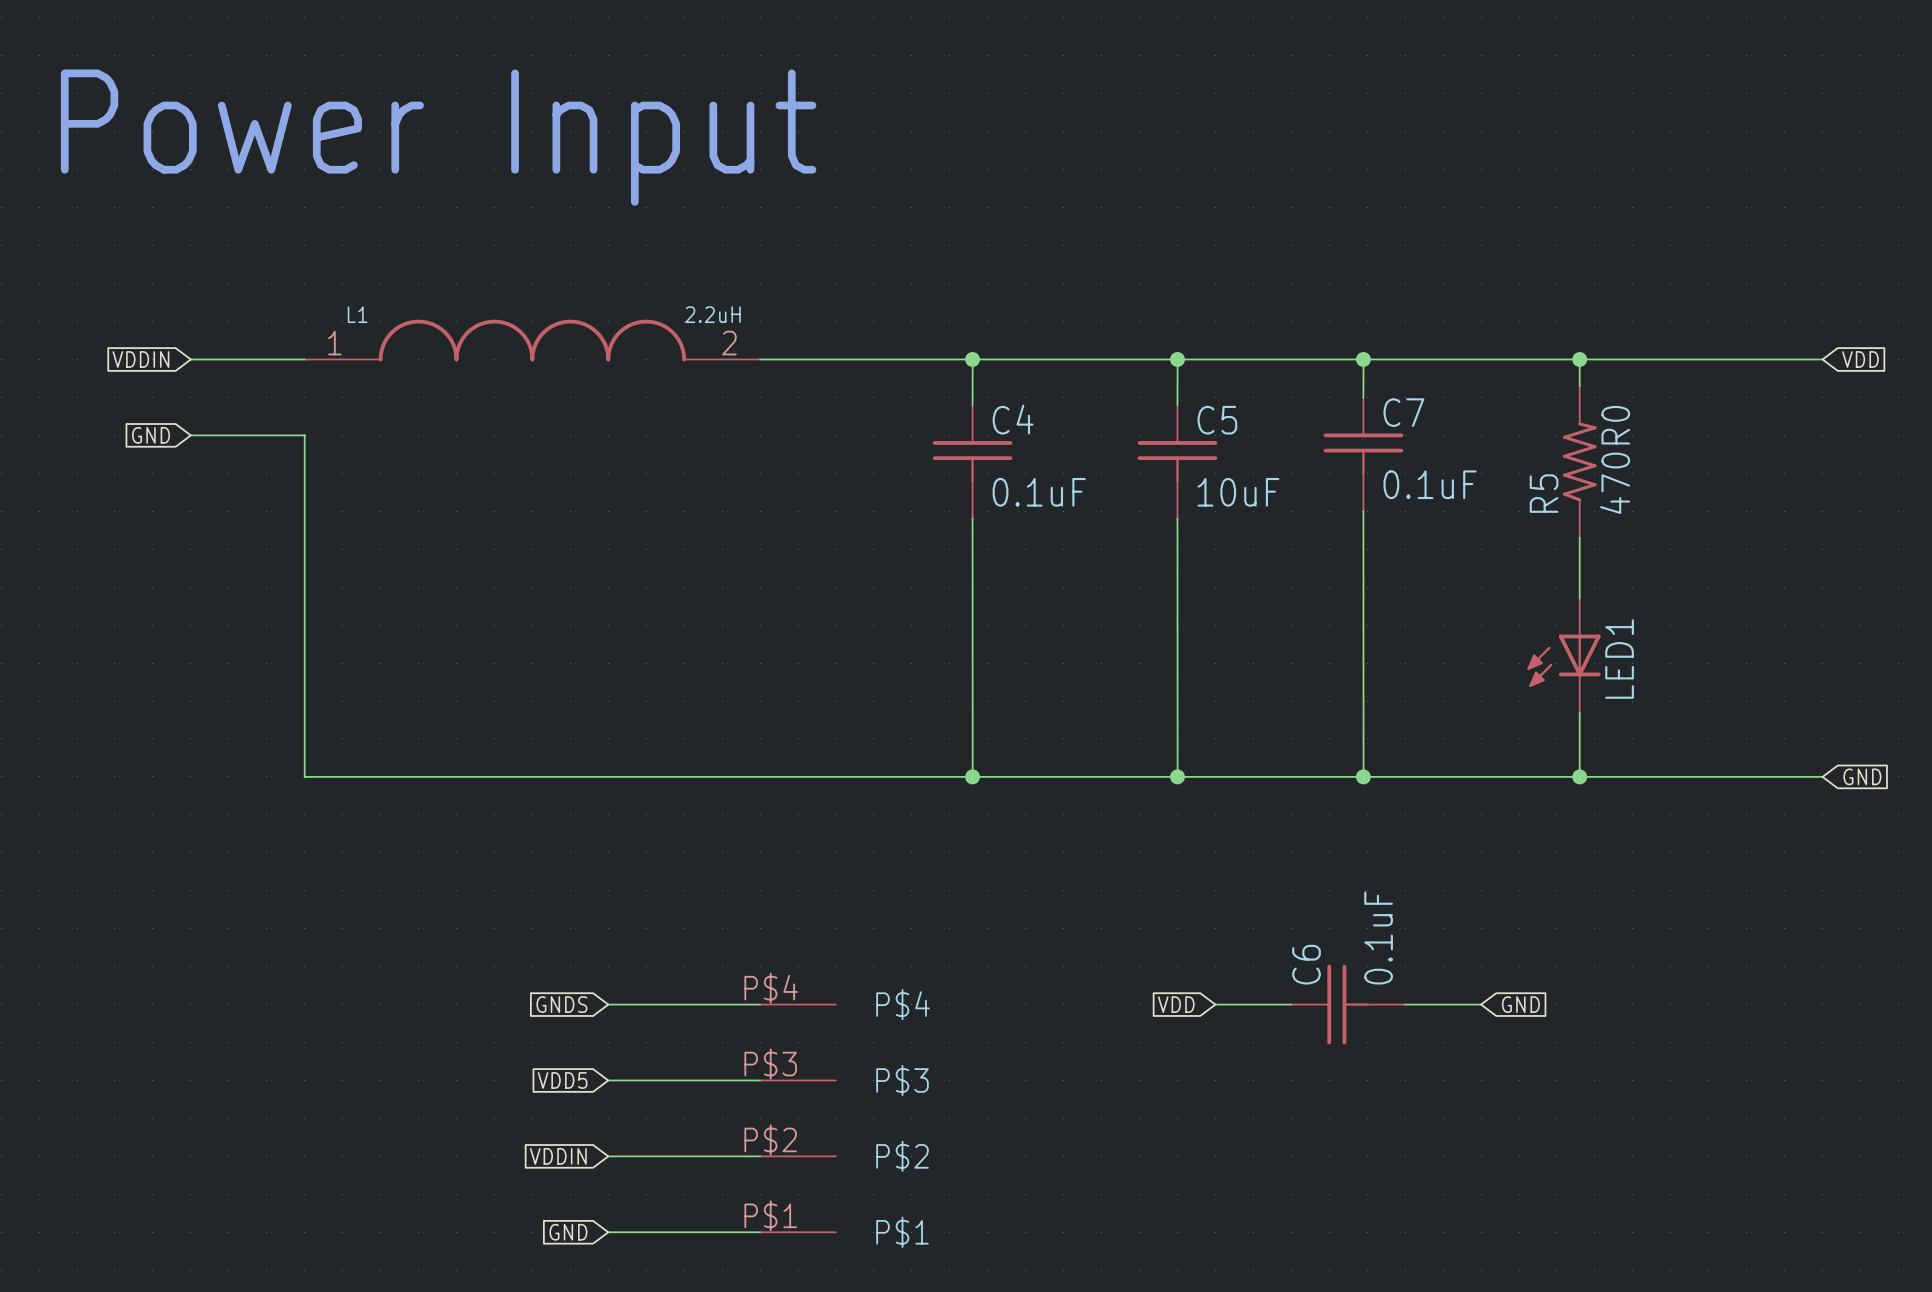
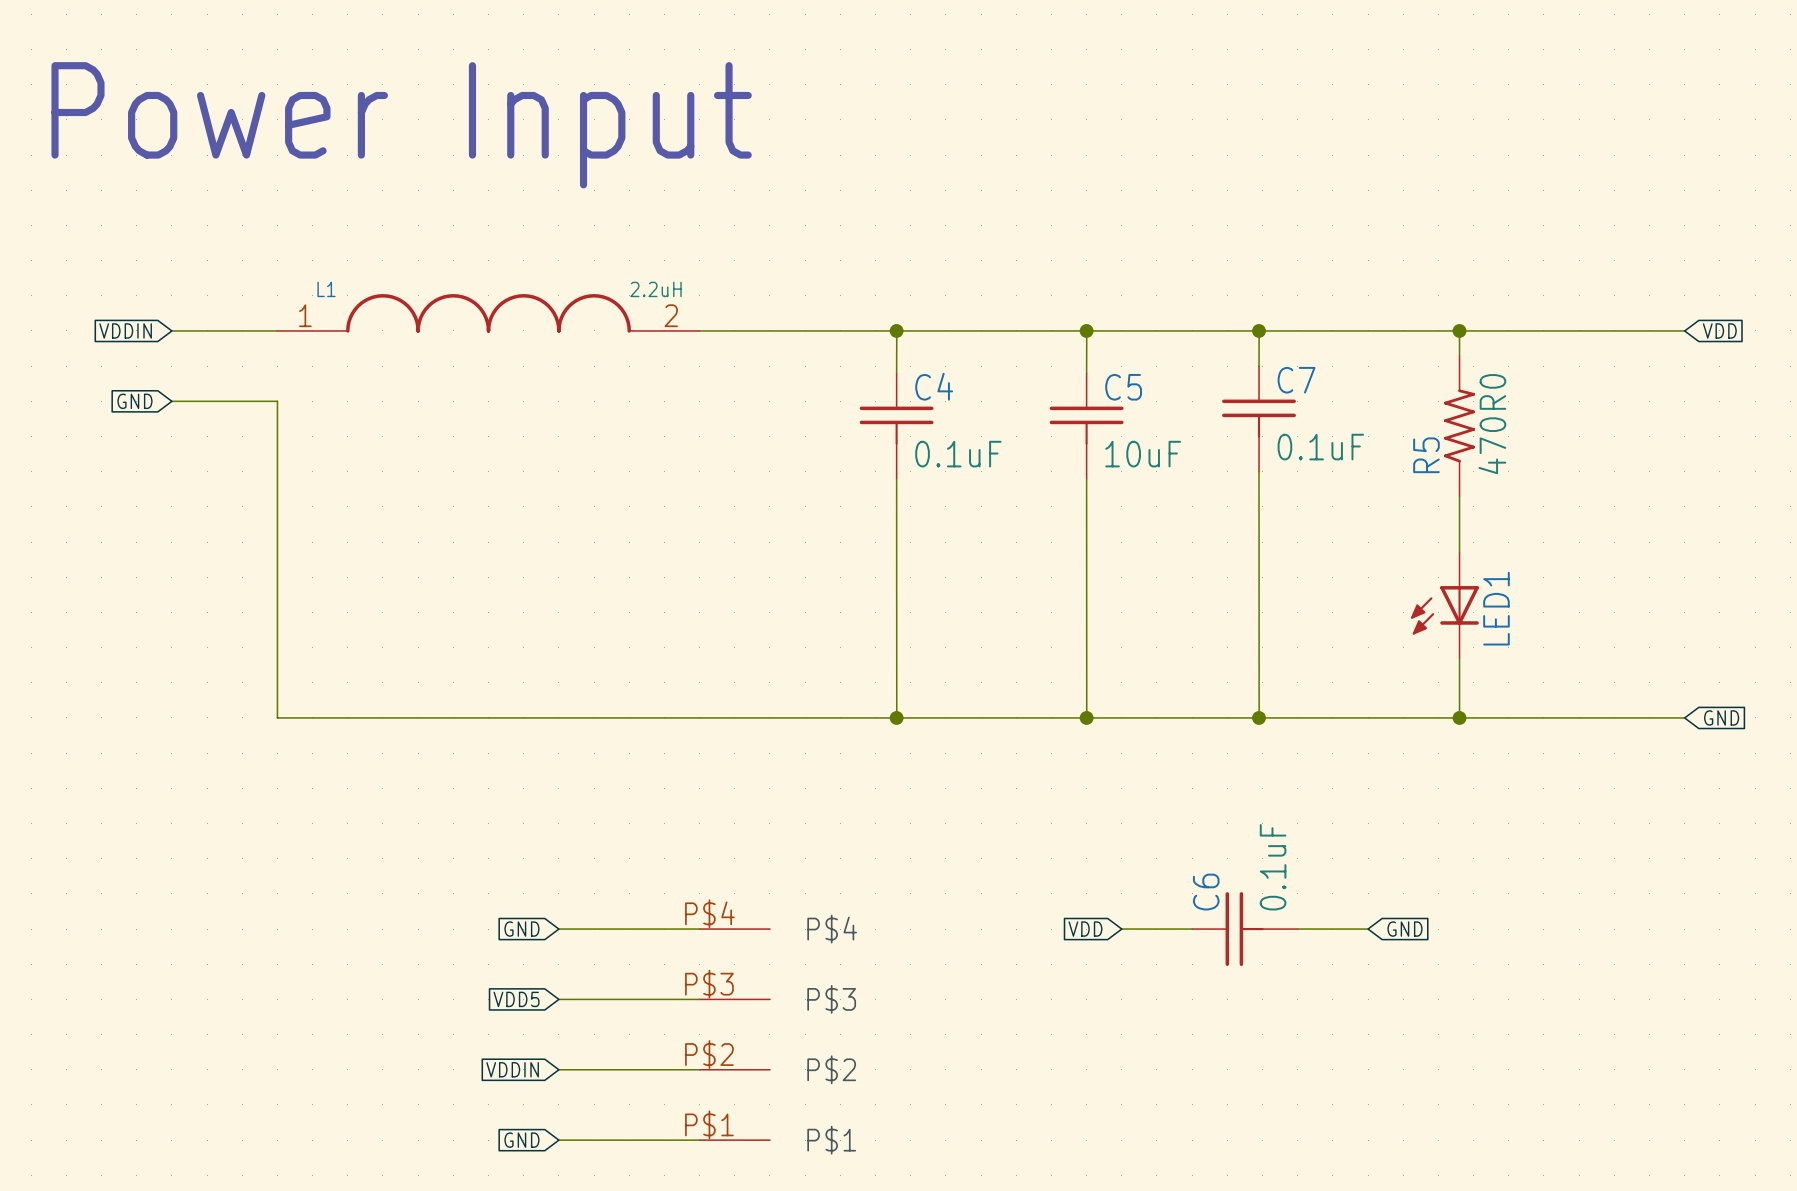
global label: GNDS (561, 1004) -> GND (521, 929)

